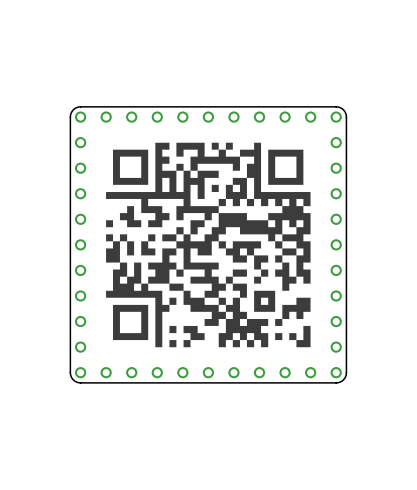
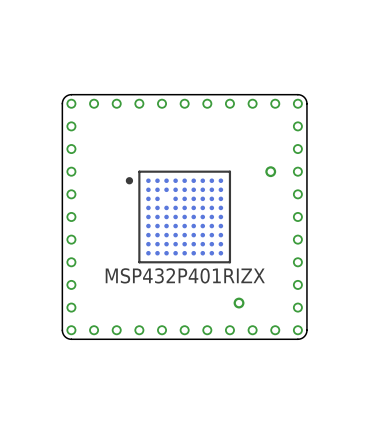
drawing: [106, 142, 311, 348] -> none
via: none -> (270, 171)
part: none -> (178, 216)
text: none -> MSP432P401RIZX (185, 275)
via: none -> (239, 303)

